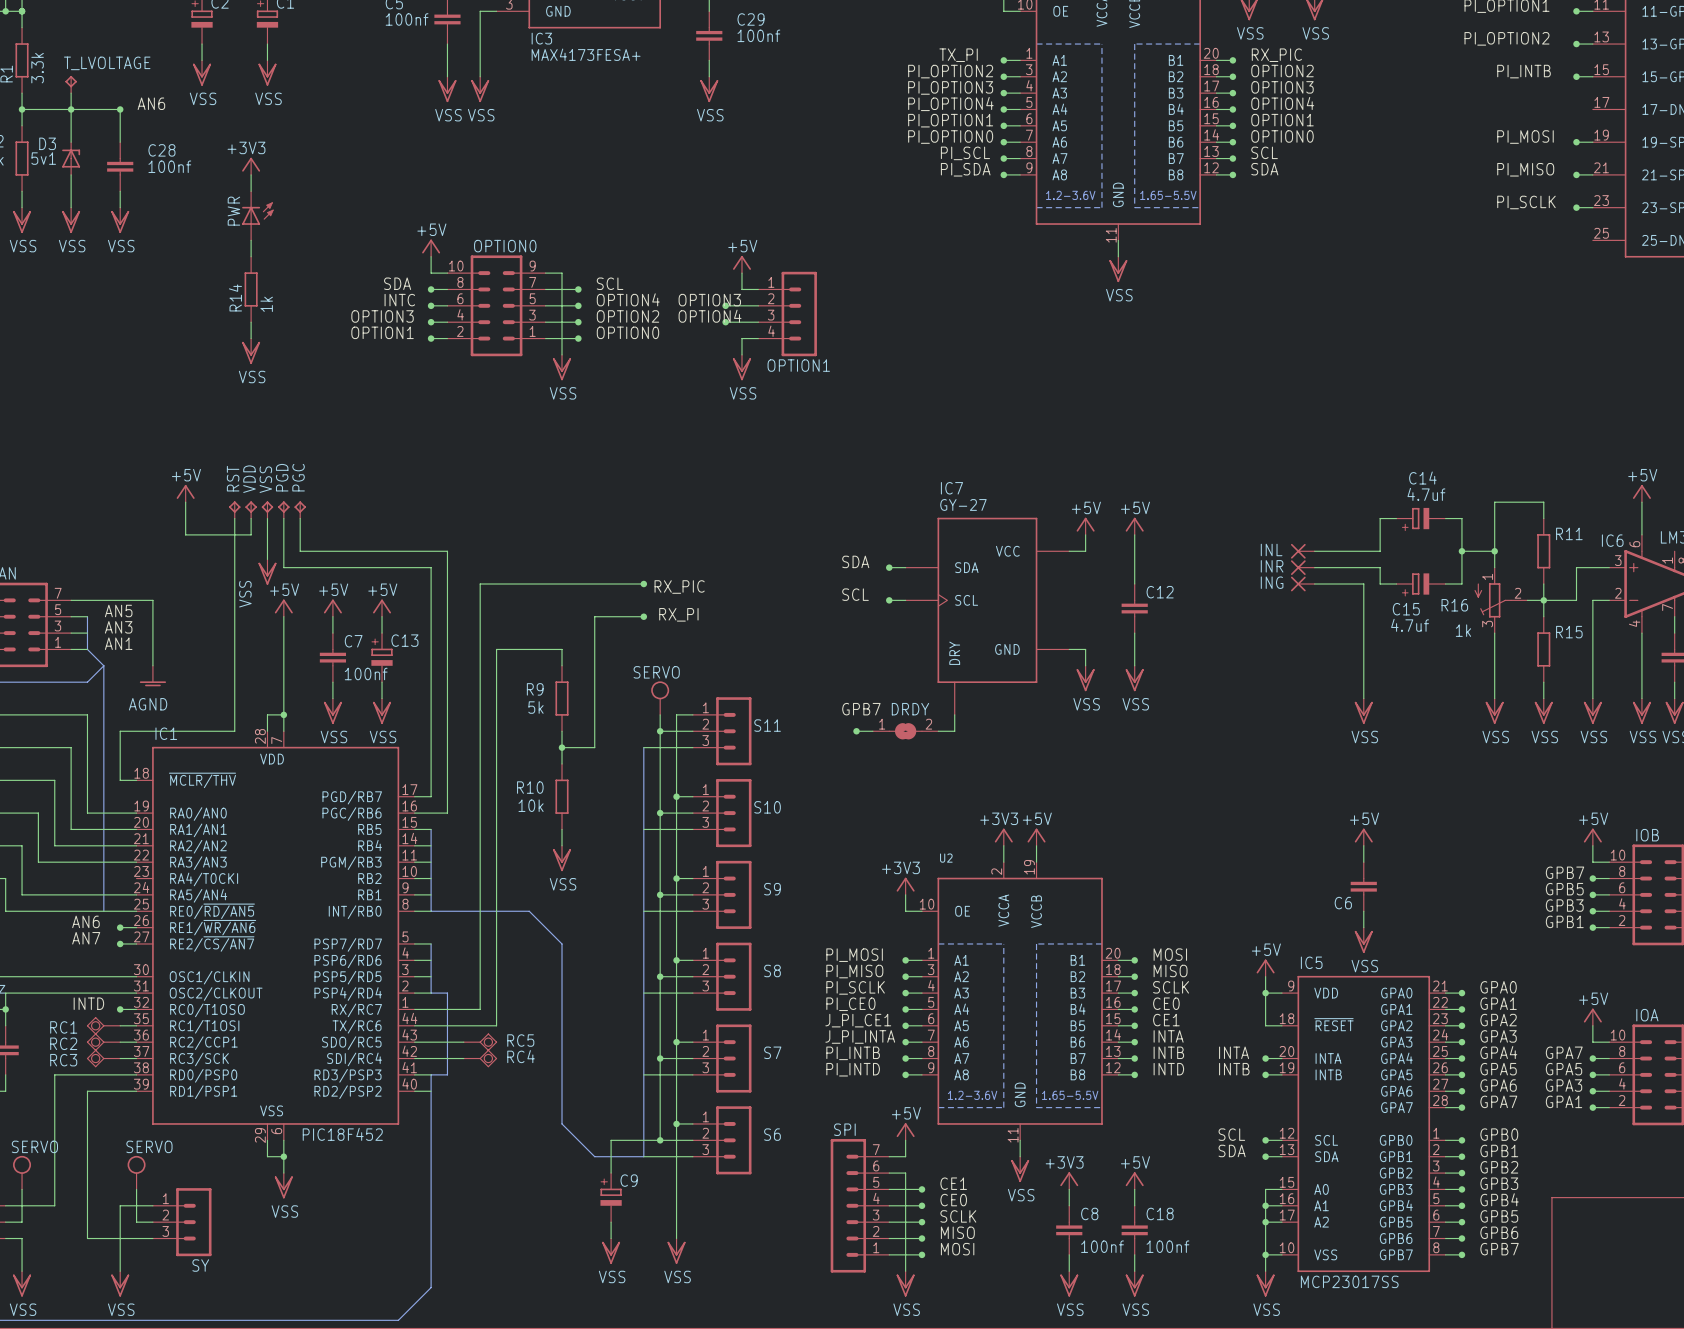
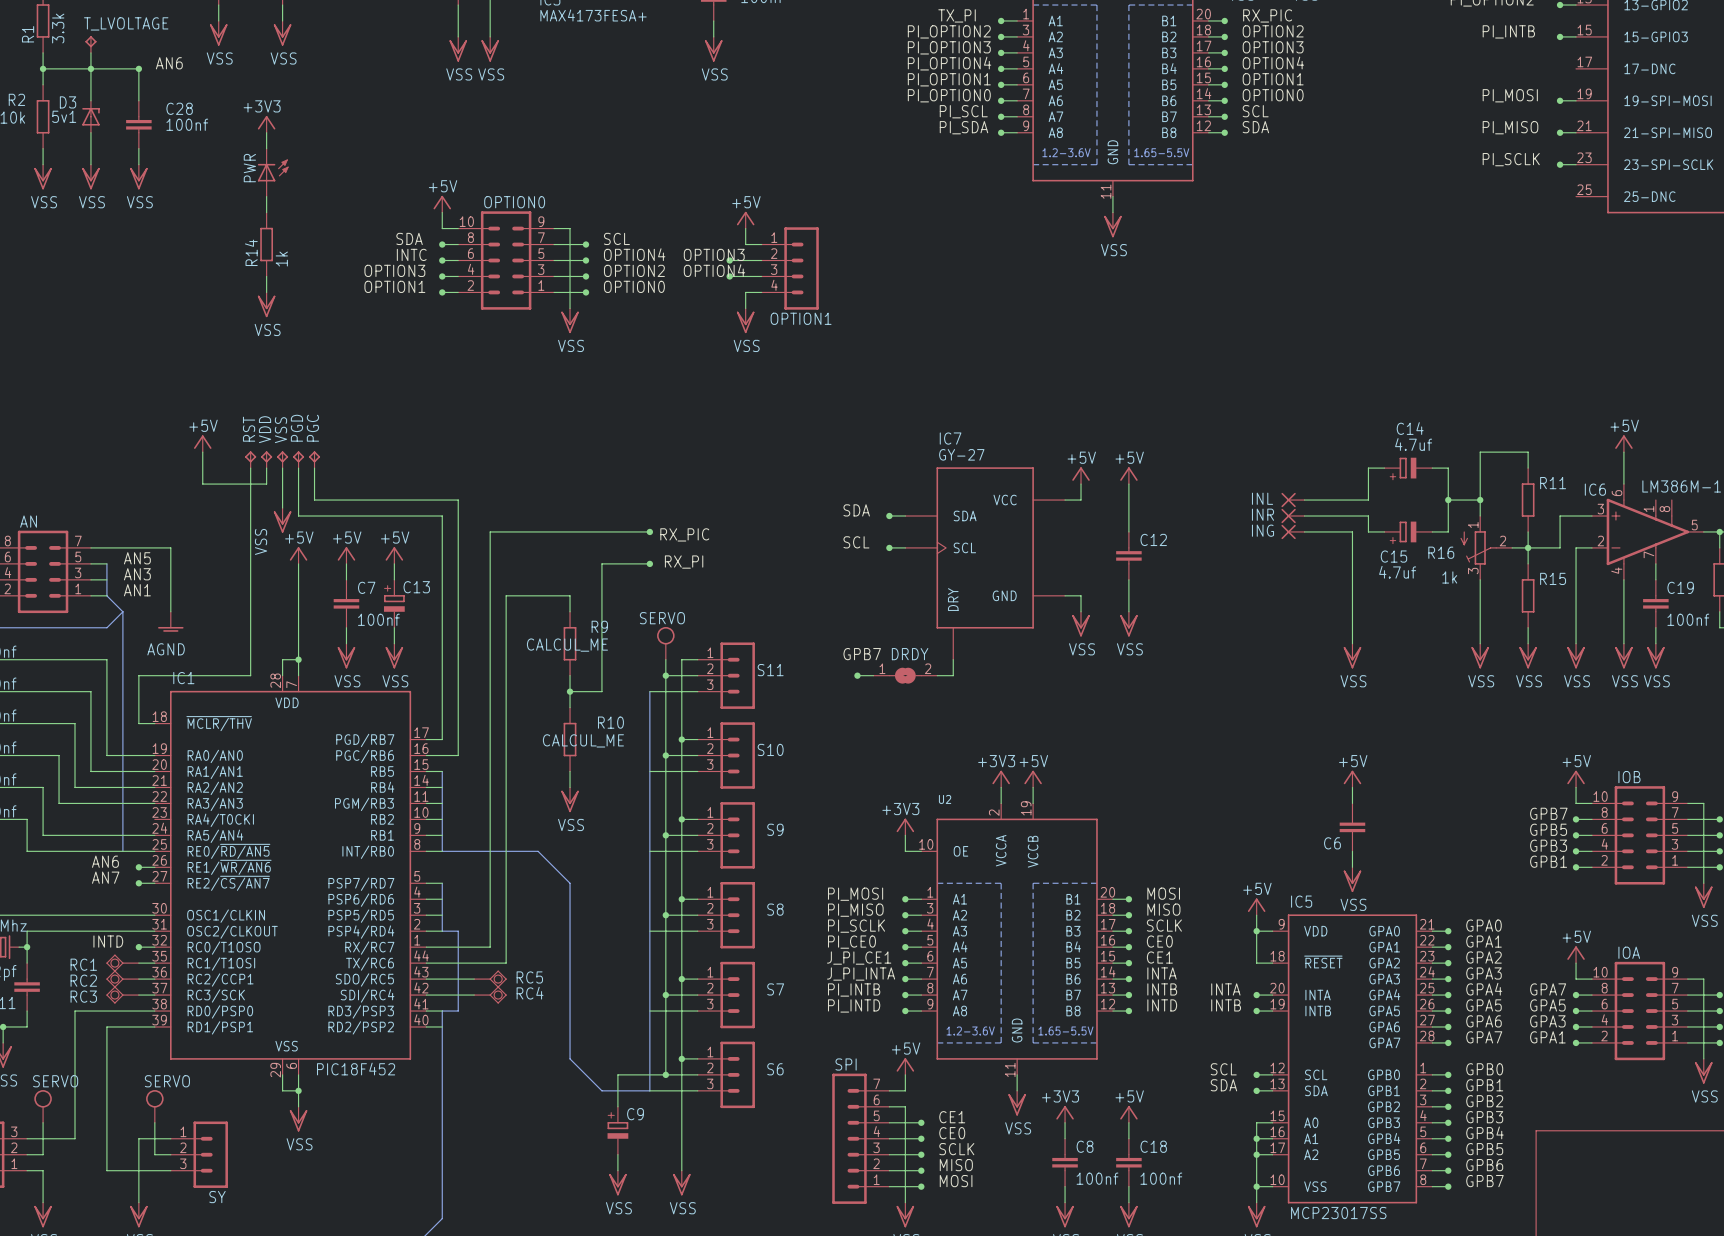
R9 name position: R9 (535, 689) -> R9 (599, 626)
R9 value: 5k (535, 707) -> CALCUL_ME (567, 645)
R10 name position: R10 (530, 787) -> R10 (610, 722)
R10 value: 10k (531, 805) -> CALCUL_ME (583, 740)

